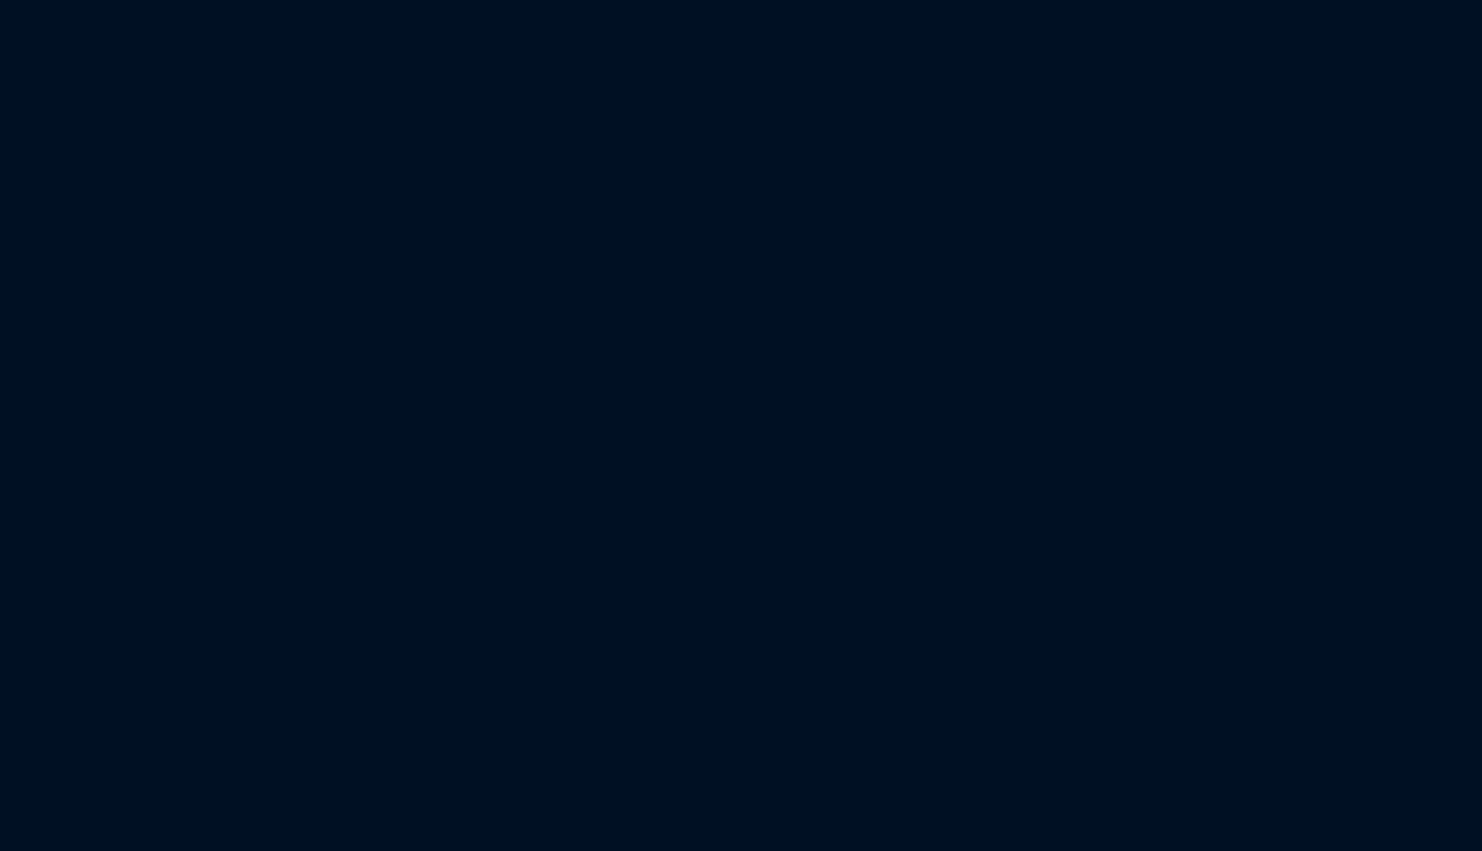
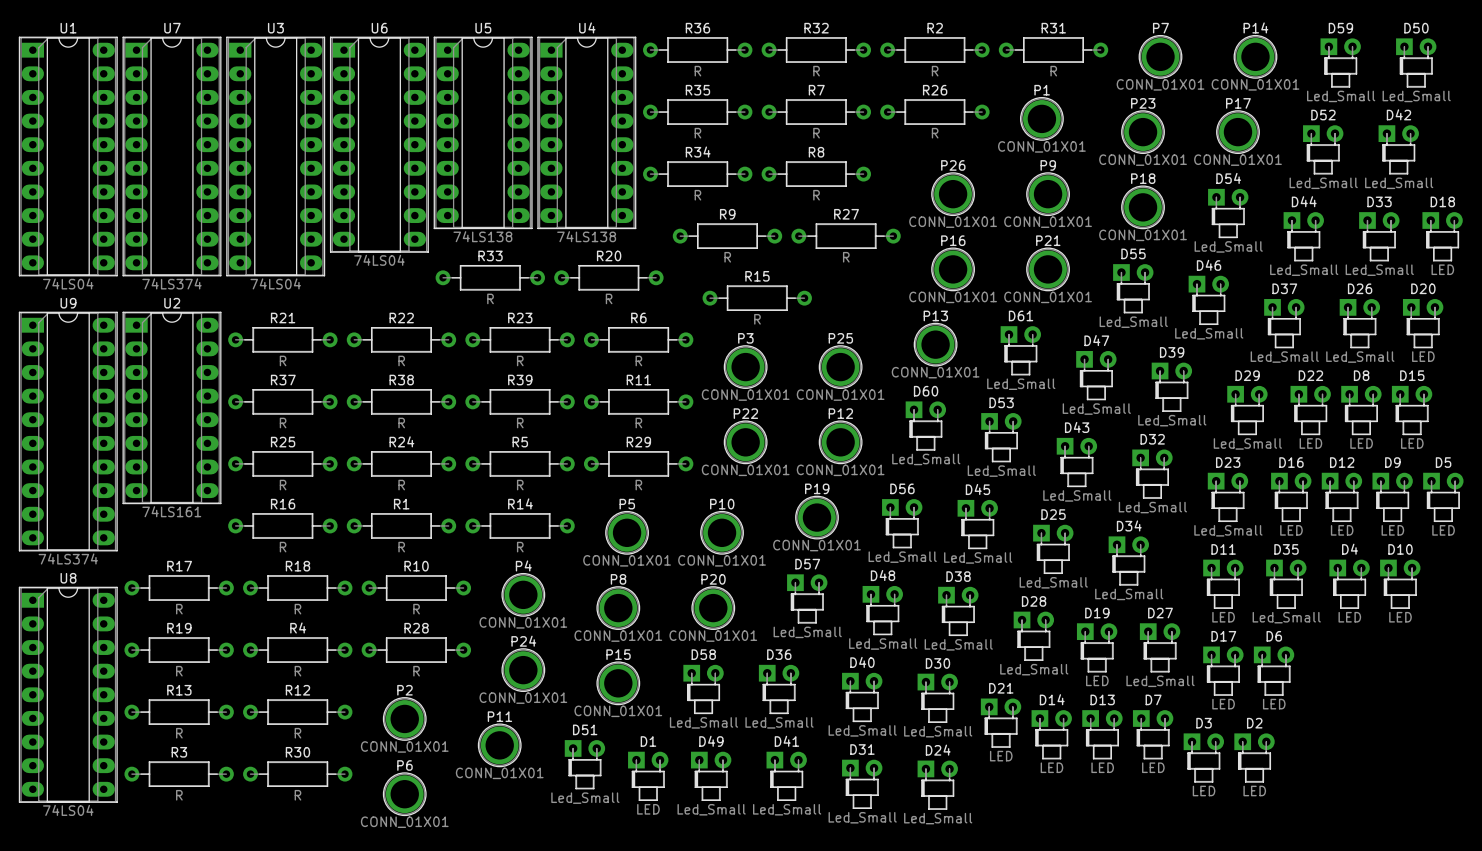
R36: none -> R (697, 50)
R32: none -> R (816, 50)
R2: none -> R (934, 50)
R31: none -> R (1053, 50)
P7: none -> CONN_01X01 (1160, 56)
P14: none -> CONN_01X01 (1255, 56)
D59: none -> Led_Small (1340, 62)
D50: none -> Led_Small (1416, 62)
R35: none -> R (697, 112)
R7: none -> R (816, 112)
R26: none -> R (934, 112)
P1: none -> CONN_01X01 (1041, 118)
U5: none -> 74LS138 (483, 132)
U4: none -> 74LS138 (586, 132)
P23: none -> CONN_01X01 (1143, 132)
P17: none -> CONN_01X01 (1237, 132)
U6: none -> 74LS04 (379, 144)
D52: none -> Led_Small (1323, 149)
D42: none -> Led_Small (1398, 149)
U1: none -> 74LS04 (68, 156)
U7: none -> 74LS374 (171, 156)
U3: none -> 74LS04 (275, 156)
R34: none -> R (697, 174)
R8: none -> R (816, 174)
P26: none -> CONN_01X01 (953, 194)
P9: none -> CONN_01X01 (1048, 194)
P18: none -> CONN_01X01 (1143, 207)
D54: none -> Led_Small (1228, 213)
R9: none -> R (727, 236)
R27: none -> R (846, 236)
D44: none -> Led_Small (1303, 236)
D33: none -> Led_Small (1379, 236)
D18: none -> LED (1442, 236)
P16: none -> CONN_01X01 (953, 269)
P21: none -> CONN_01X01 (1048, 269)
R33: none -> R (490, 277)
R20: none -> R (608, 277)
D55: none -> Led_Small (1133, 288)
R15: none -> R (757, 298)
D46: none -> Led_Small (1208, 300)
D37: none -> Led_Small (1284, 323)
D26: none -> Led_Small (1359, 323)
D20: none -> LED (1423, 323)
R21: none -> R (282, 339)
R22: none -> R (401, 339)
R23: none -> R (520, 339)
R6: none -> R (638, 339)
P13: none -> CONN_01X01 (935, 344)
D61: none -> Led_Small (1020, 350)
P3: none -> CONN_01X01 (745, 367)
P25: none -> CONN_01X01 (840, 367)
D47: none -> Led_Small (1096, 375)
D39: none -> Led_Small (1171, 387)
R37: none -> R (282, 401)
R38: none -> R (401, 401)
R39: none -> R (520, 401)
R11: none -> R (638, 401)
U2: none -> 74LS161 (171, 407)
D29: none -> Led_Small (1247, 410)
D22: none -> LED (1310, 410)
D8: none -> LED (1361, 410)
D15: none -> LED (1412, 410)
D60: none -> Led_Small (925, 426)
U9: none -> 74LS374 (68, 431)
D53: none -> Led_Small (1001, 437)
P22: none -> CONN_01X01 (745, 442)
P12: none -> CONN_01X01 (840, 442)
D43: none -> Led_Small (1076, 462)
R25: none -> R (282, 463)
R24: none -> R (401, 463)
R5: none -> R (520, 463)
R29: none -> R (638, 463)
D32: none -> Led_Small (1152, 474)
D23: none -> Led_Small (1227, 497)
D16: none -> LED (1291, 497)
D12: none -> LED (1341, 497)
D9: none -> LED (1392, 497)
D5: none -> LED (1443, 497)
P19: none -> CONN_01X01 (817, 517)
D56: none -> Led_Small (902, 523)
D45: none -> Led_Small (977, 524)
R16: none -> R (282, 525)
R1: none -> R (401, 525)
R14: none -> R (520, 525)
P5: none -> CONN_01X01 (627, 532)
P10: none -> CONN_01X01 (722, 532)
D25: none -> Led_Small (1053, 549)
D34: none -> Led_Small (1128, 560)
D11: none -> LED (1223, 584)
D35: none -> Led_Small (1286, 584)
D4: none -> LED (1349, 584)
D10: none -> LED (1400, 584)
R17: none -> R (179, 588)
R18: none -> R (297, 588)
R10: none -> R (416, 588)
P4: none -> CONN_01X01 (523, 594)
D57: none -> Led_Small (807, 598)
P8: none -> CONN_01X01 (618, 608)
P20: none -> CONN_01X01 (713, 608)
D48: none -> Led_Small (882, 610)
D38: none -> Led_Small (958, 611)
D28: none -> Led_Small (1033, 636)
D19: none -> LED (1097, 647)
D27: none -> Led_Small (1160, 647)
R19: none -> R (179, 650)
R4: none -> R (297, 650)
R28: none -> R (416, 650)
P24: none -> CONN_01X01 (523, 670)
D17: none -> LED (1223, 671)
D6: none -> LED (1274, 671)
P15: none -> CONN_01X01 (618, 683)
D58: none -> Led_Small (703, 689)
D36: none -> Led_Small (779, 689)
U8: none -> 74LS04 (68, 694)
D40: none -> Led_Small (862, 697)
D30: none -> Led_Small (937, 698)
R13: none -> R (179, 712)
R12: none -> R (297, 712)
P2: none -> CONN_01X01 (404, 718)
D21: none -> LED (1001, 723)
D14: none -> LED (1051, 734)
D13: none -> LED (1102, 734)
D7: none -> LED (1153, 734)
P11: none -> CONN_01X01 (499, 745)
D3: none -> LED (1203, 757)
D2: none -> LED (1254, 757)
D51: none -> Led_Small (584, 764)
R3: none -> R (179, 774)
R30: none -> R (297, 774)
D1: none -> LED (648, 776)
D49: none -> Led_Small (711, 776)
D41: none -> Led_Small (786, 776)
D31: none -> Led_Small (862, 784)
D24: none -> Led_Small (937, 785)
P6: none -> CONN_01X01 (404, 794)

